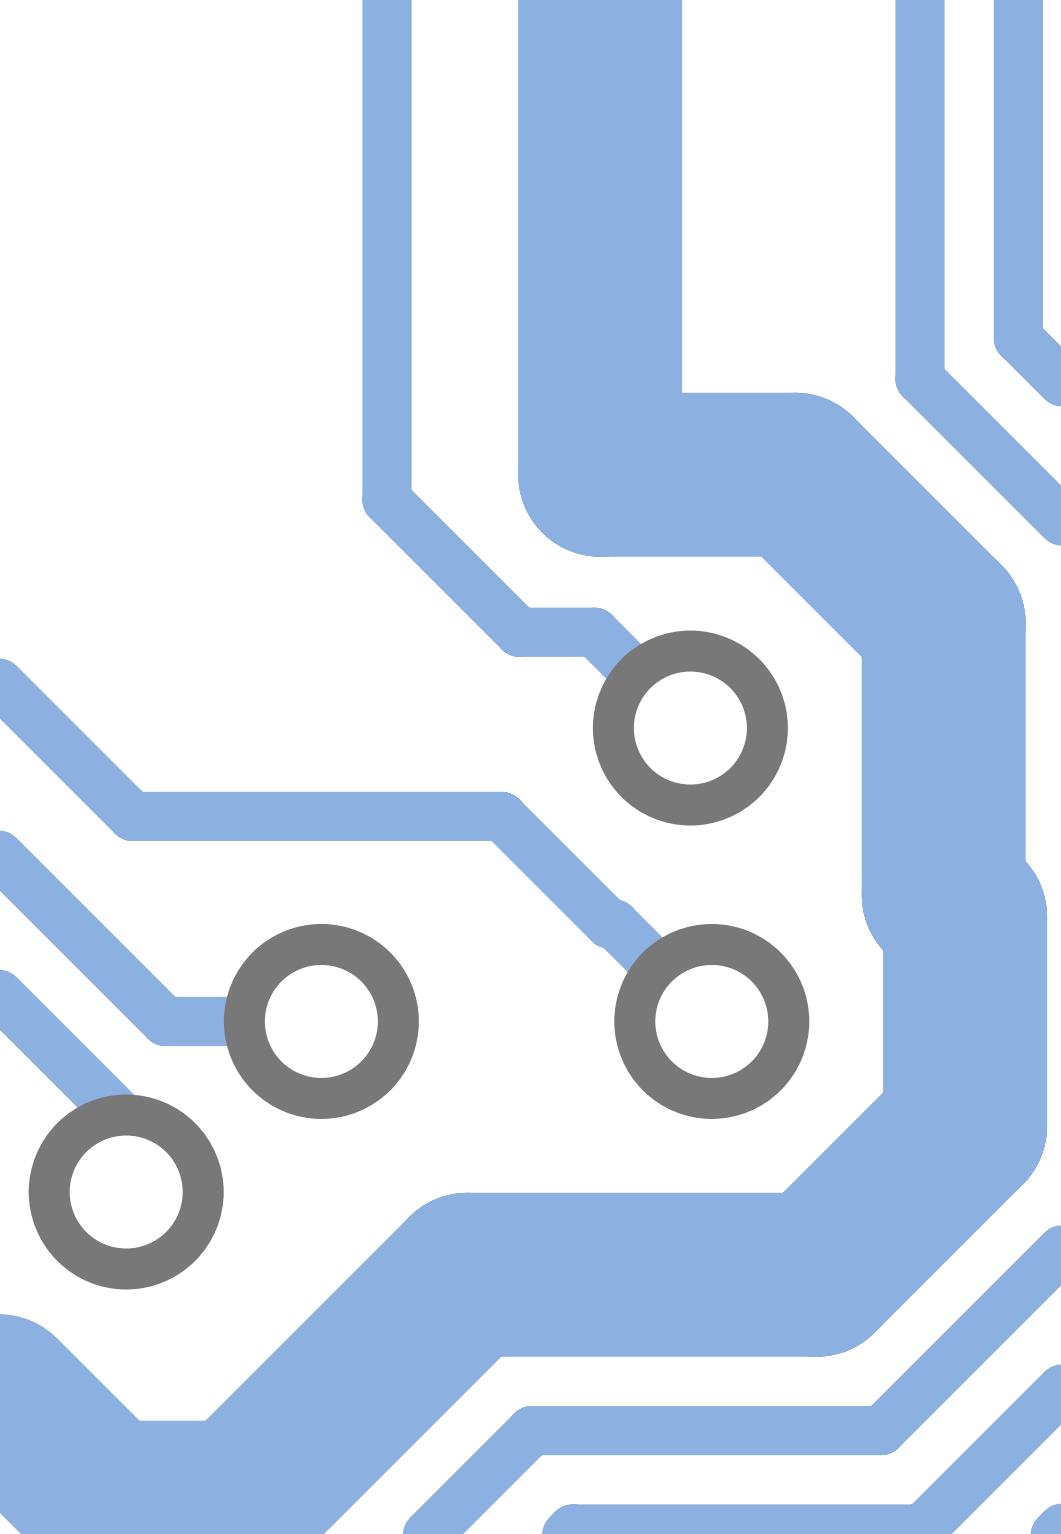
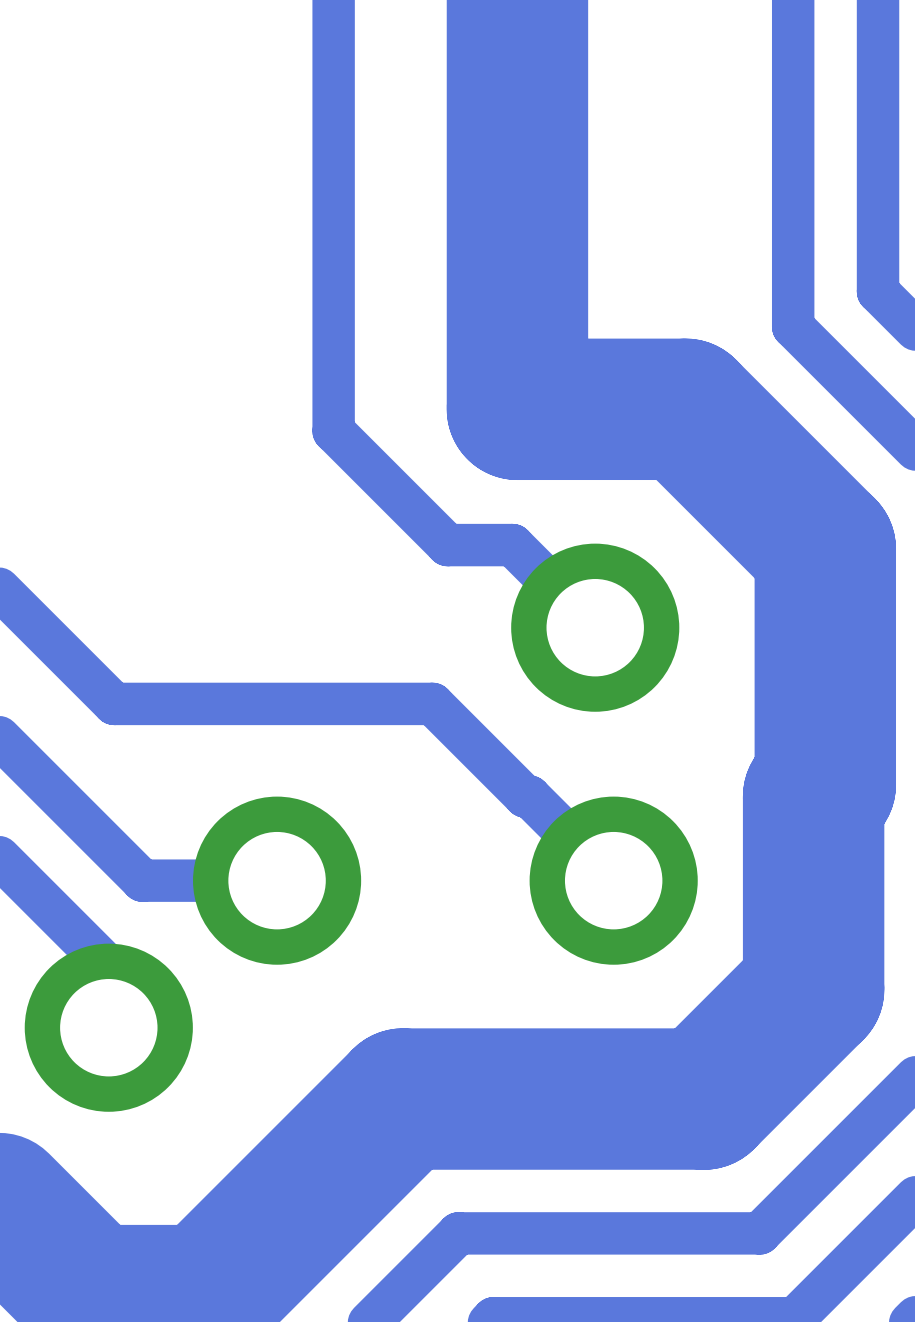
track: (943, 623) (943, 895) (965, 916) (965, 1126) (943, 1147) -> (813, 537) (825, 548) (825, 784) (813, 796) (813, 989)

